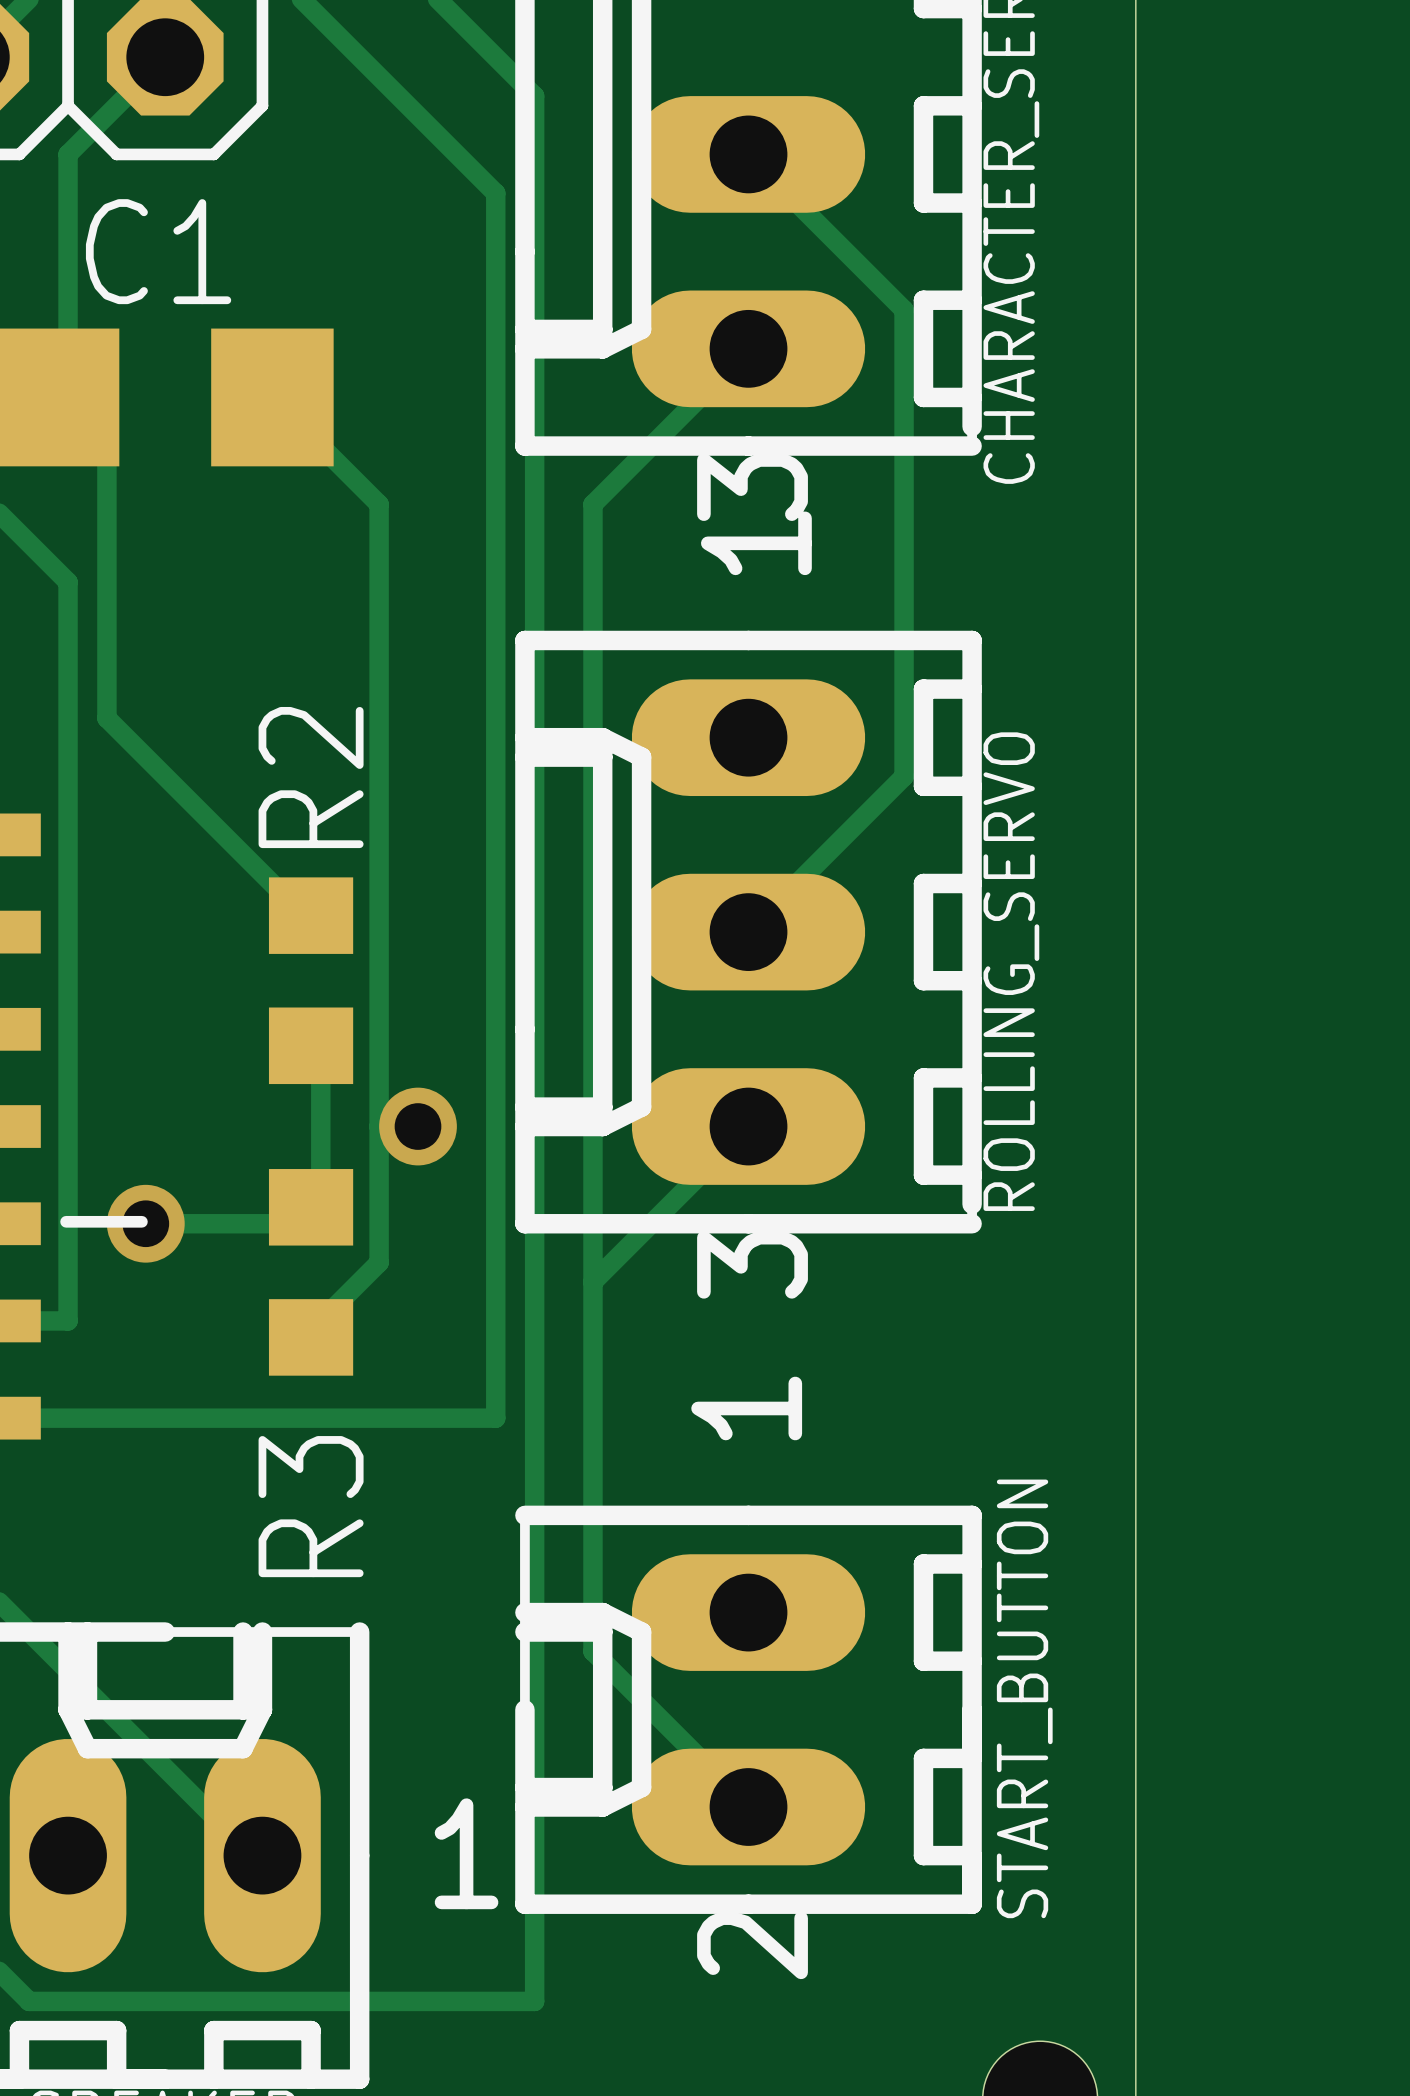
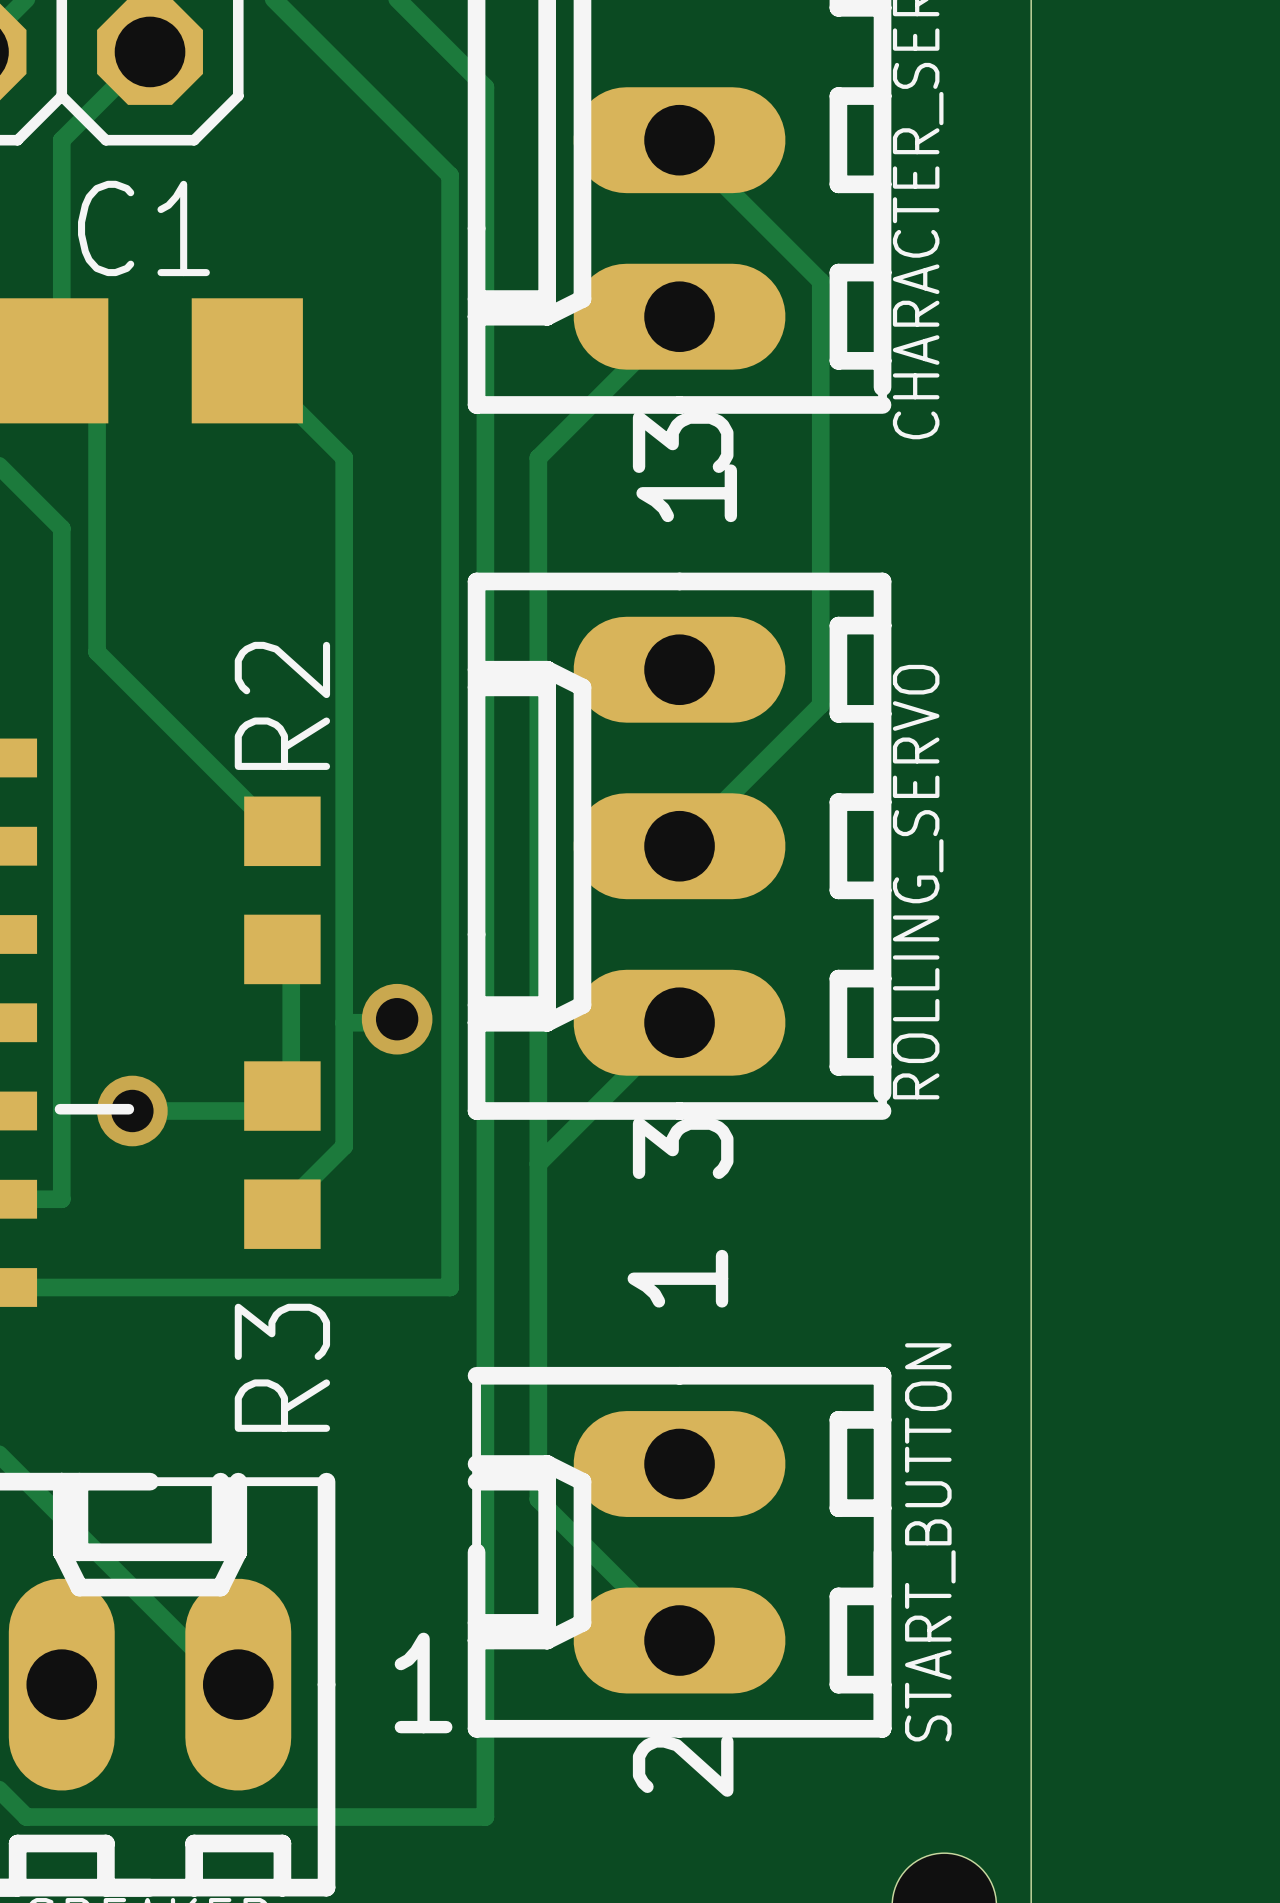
via position: (418, 1126) -> (397, 1019)

